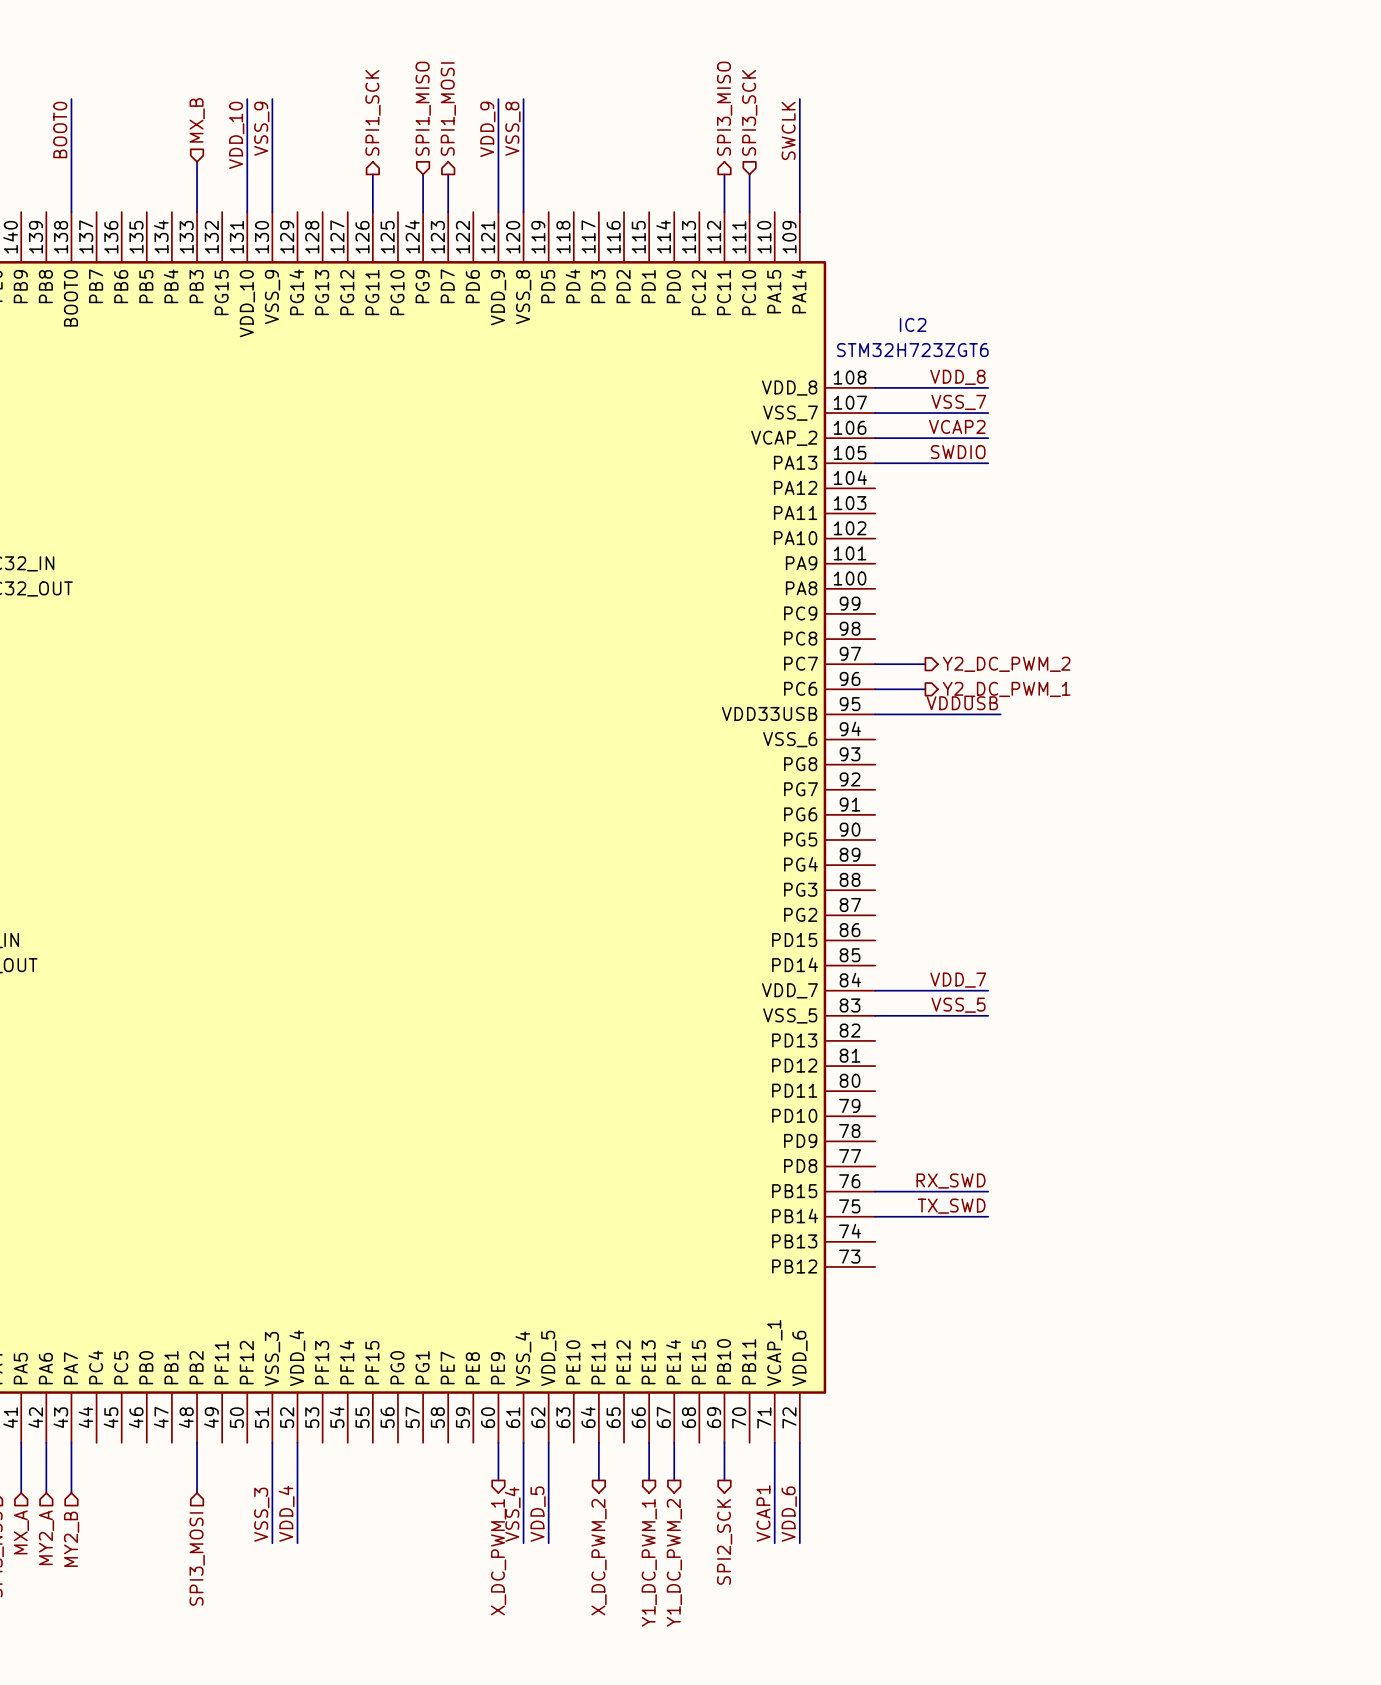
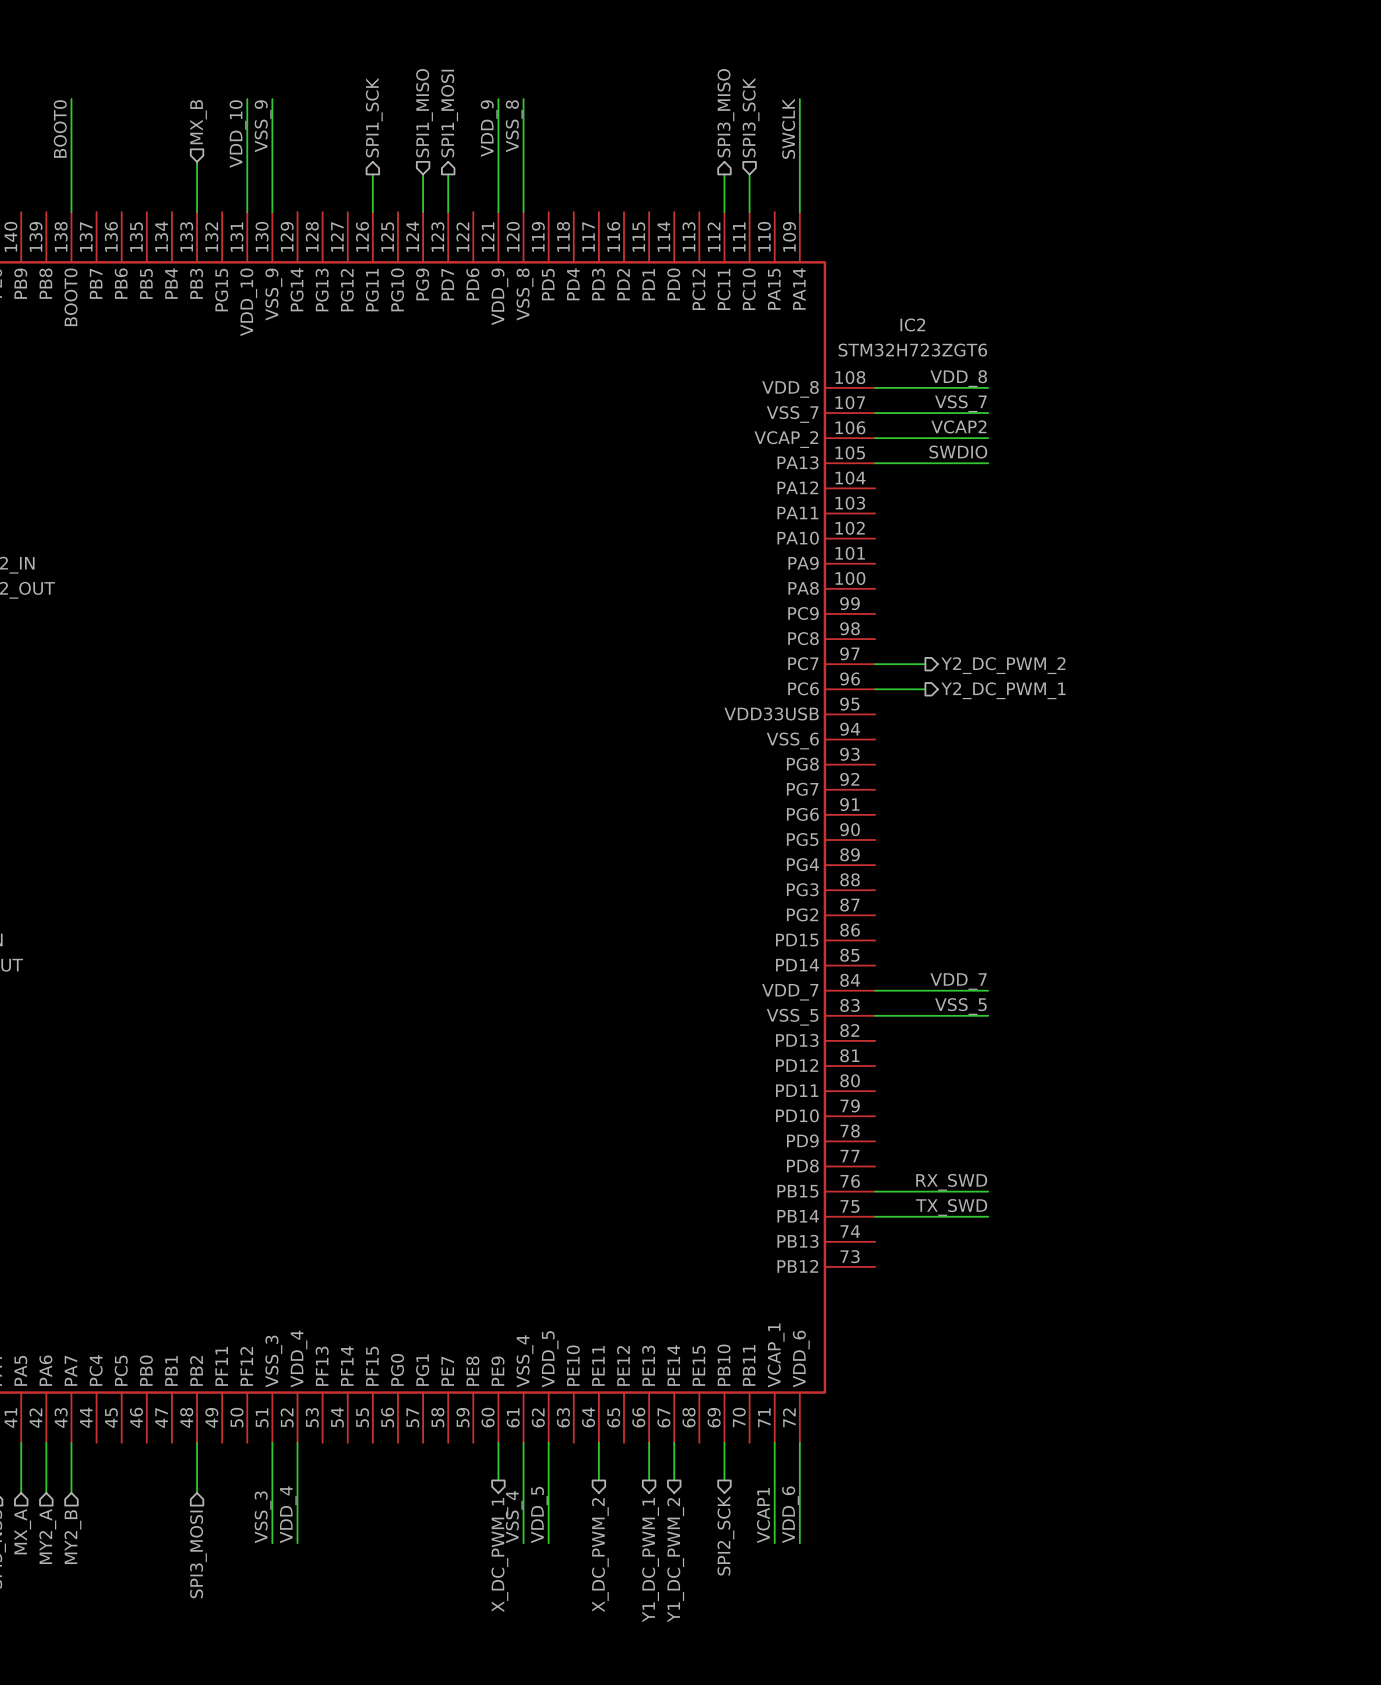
label: VDDUSB (962, 703) -> none
wire: (875, 714) (1000, 714) -> none

